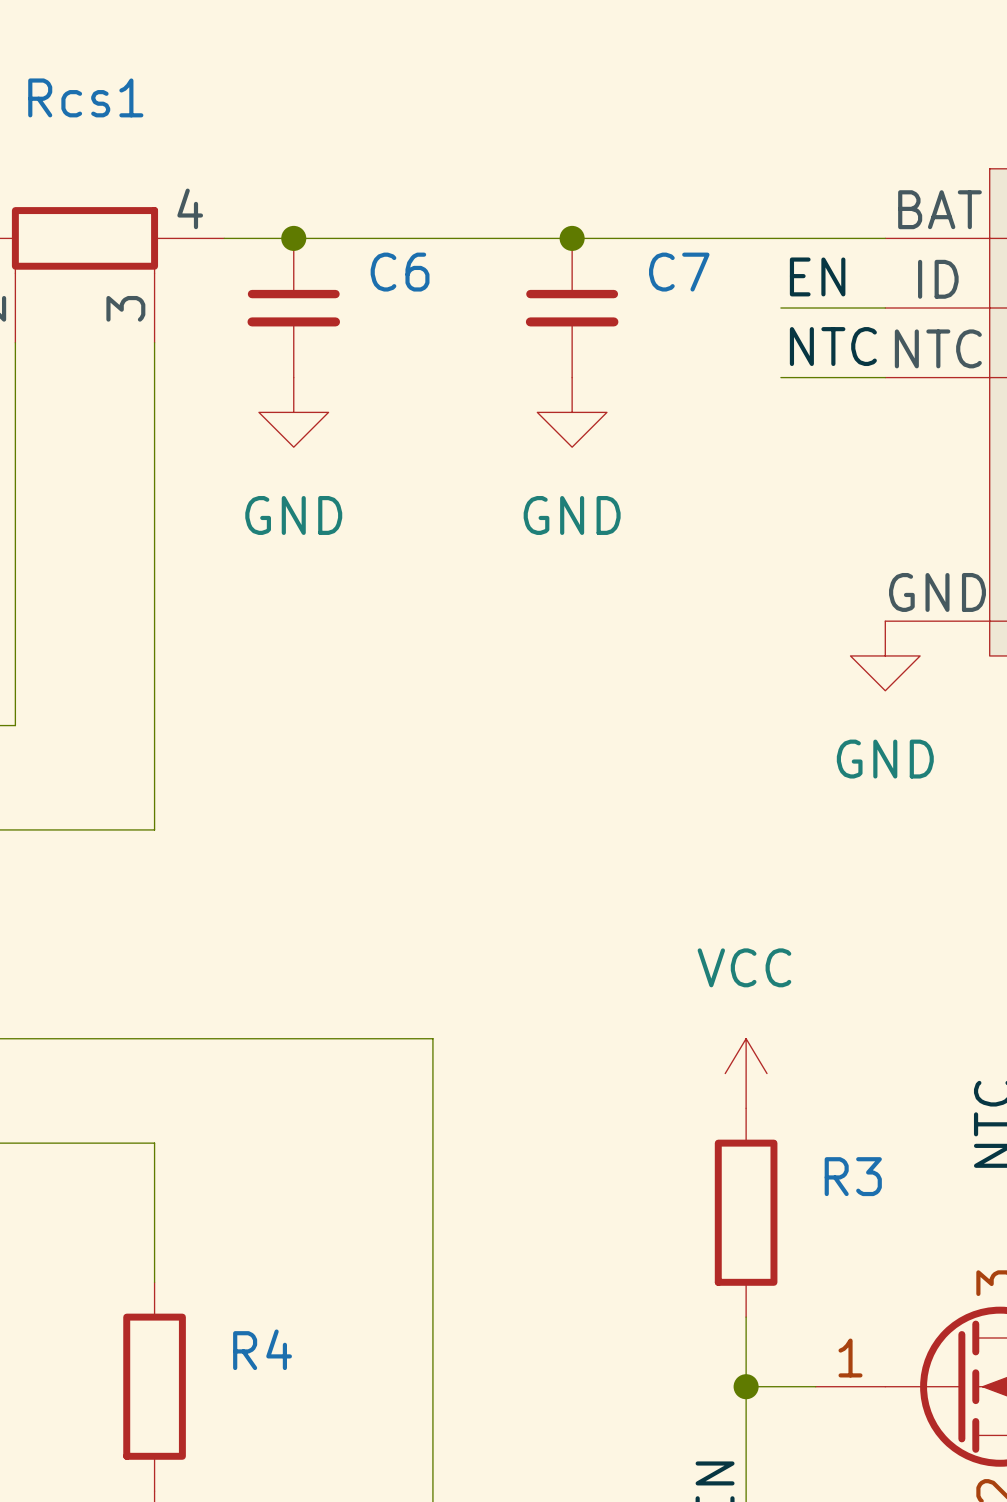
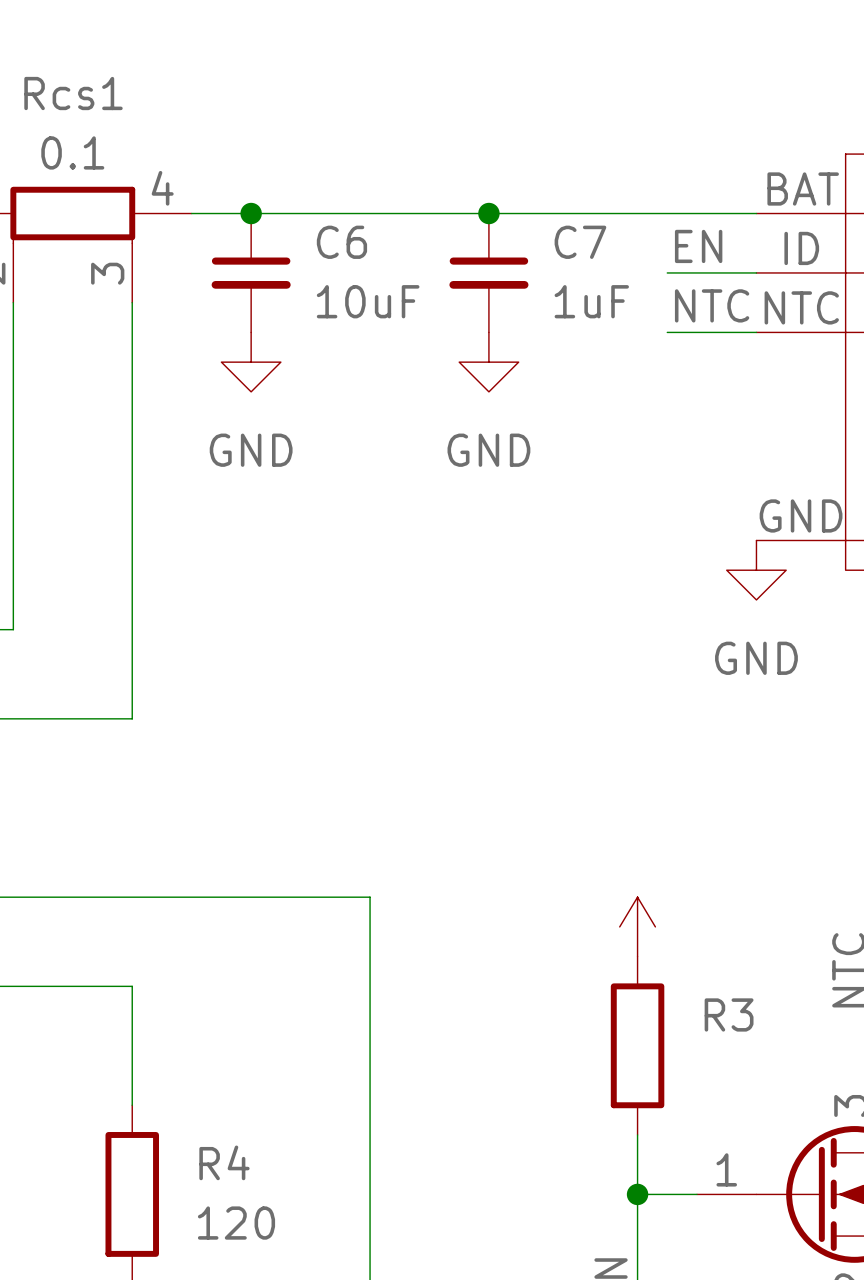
Rcs1 value: none -> 0.1 (72, 152)
C6 value: none -> 10uF (368, 301)
C7 value: none -> 1uF (591, 301)
power symbol text: VCC (744, 967) -> none
R4 value: none -> 120 (236, 1223)

